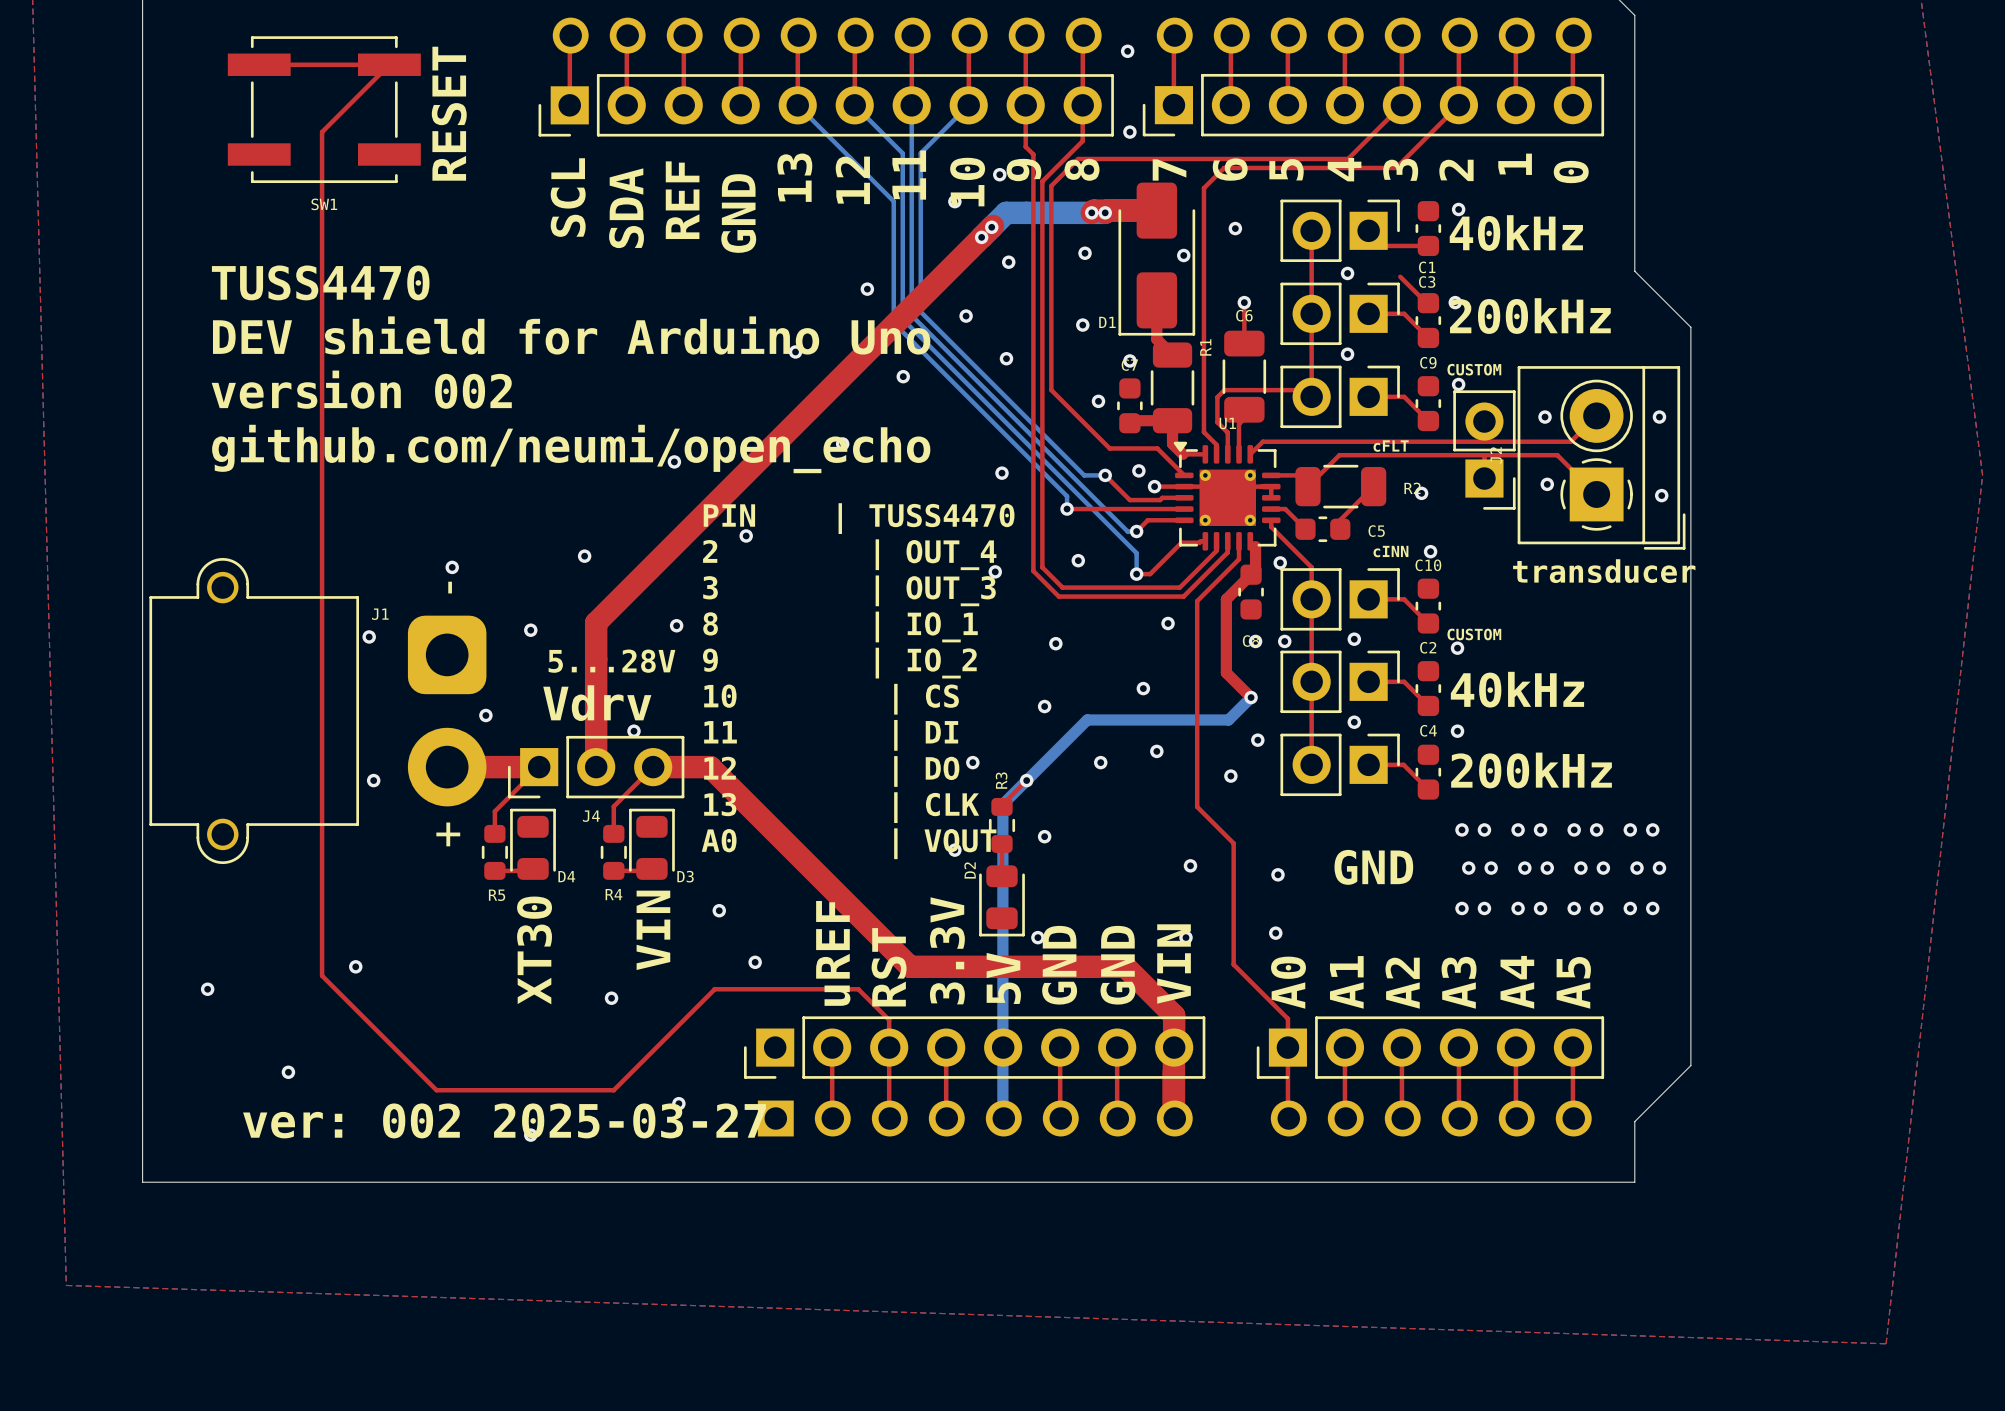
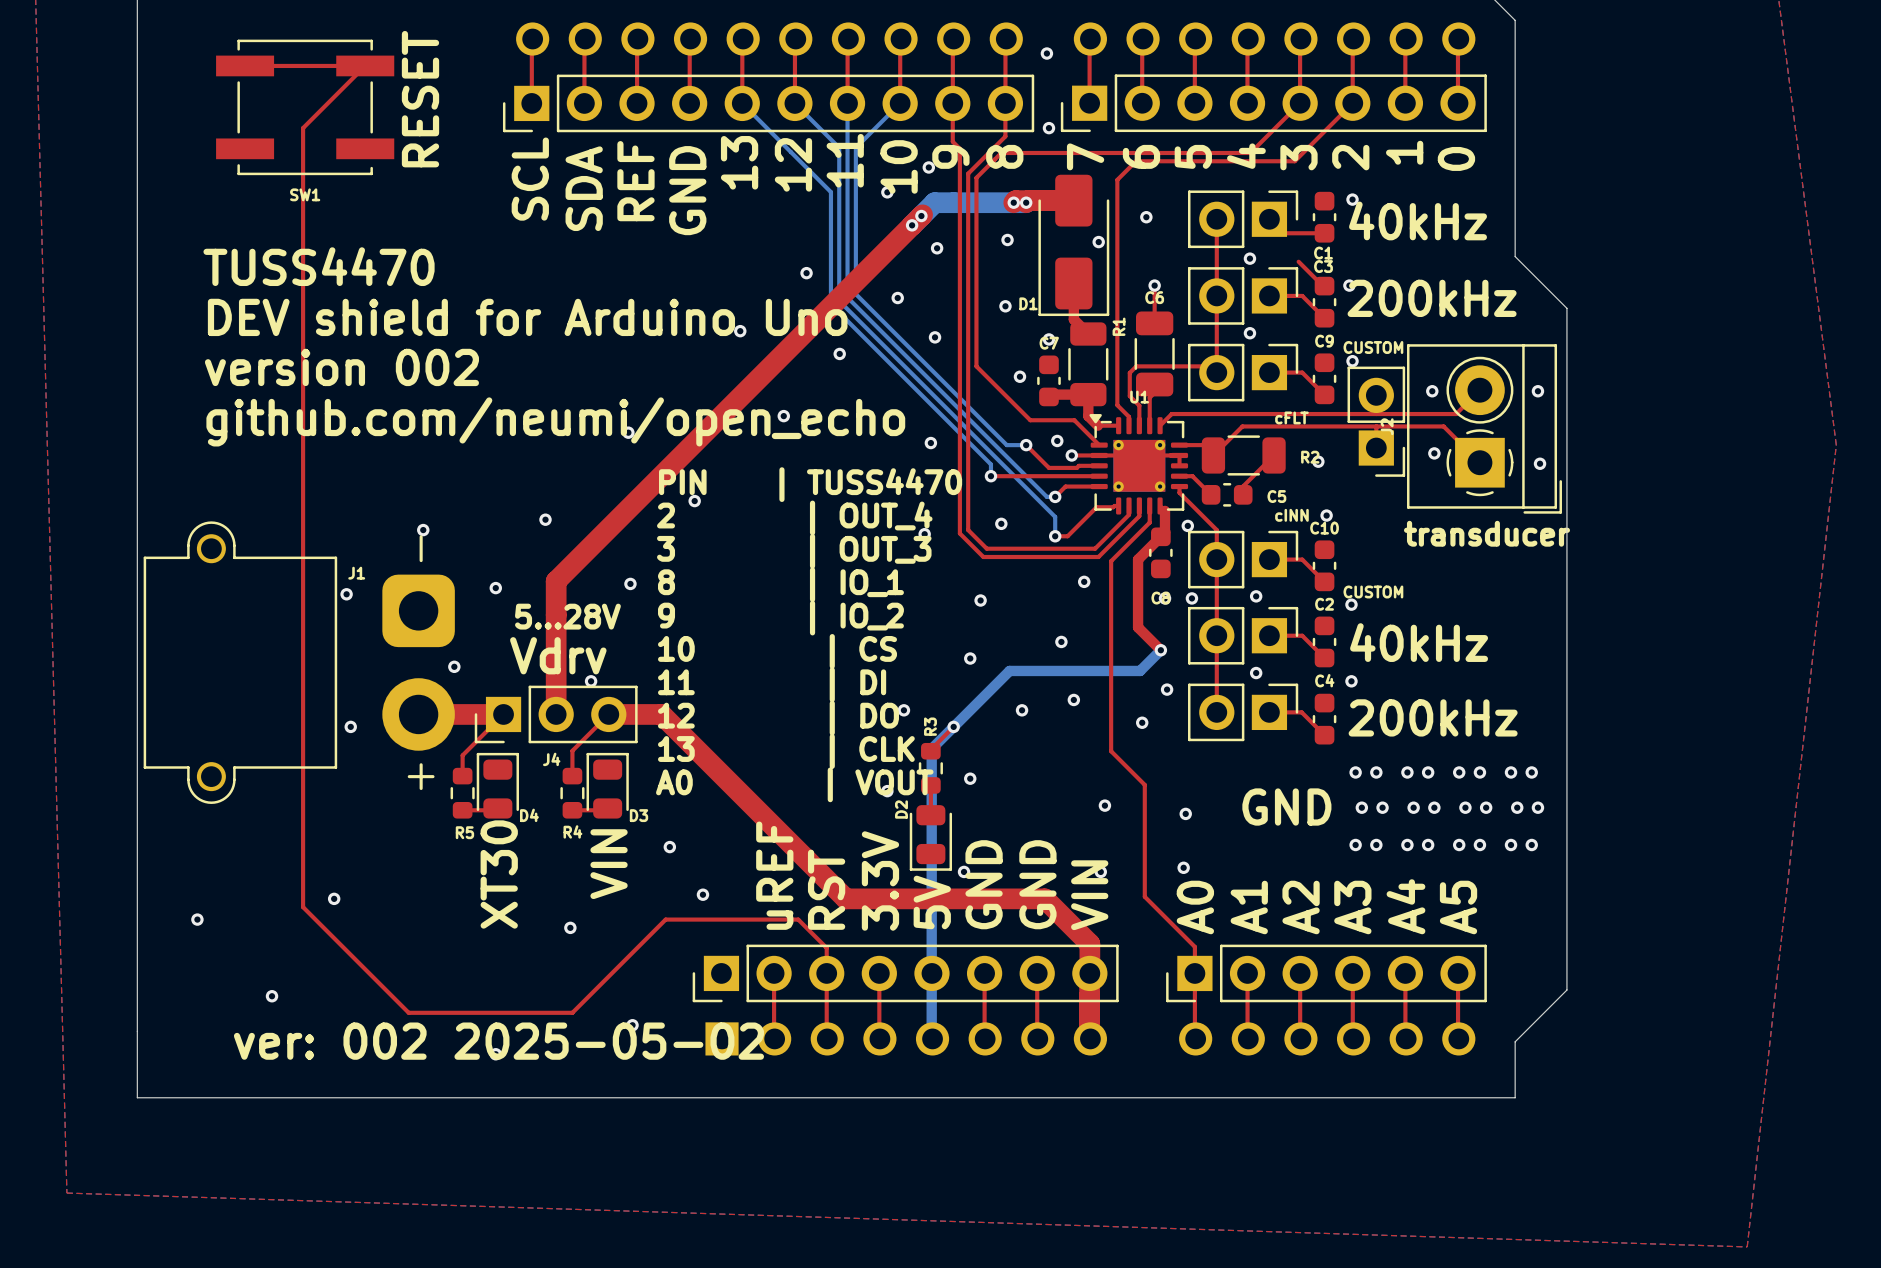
text: ver: 002 2025-03-27 (504, 1120) -> ver: 002 2025-05-02 (498, 1041)

